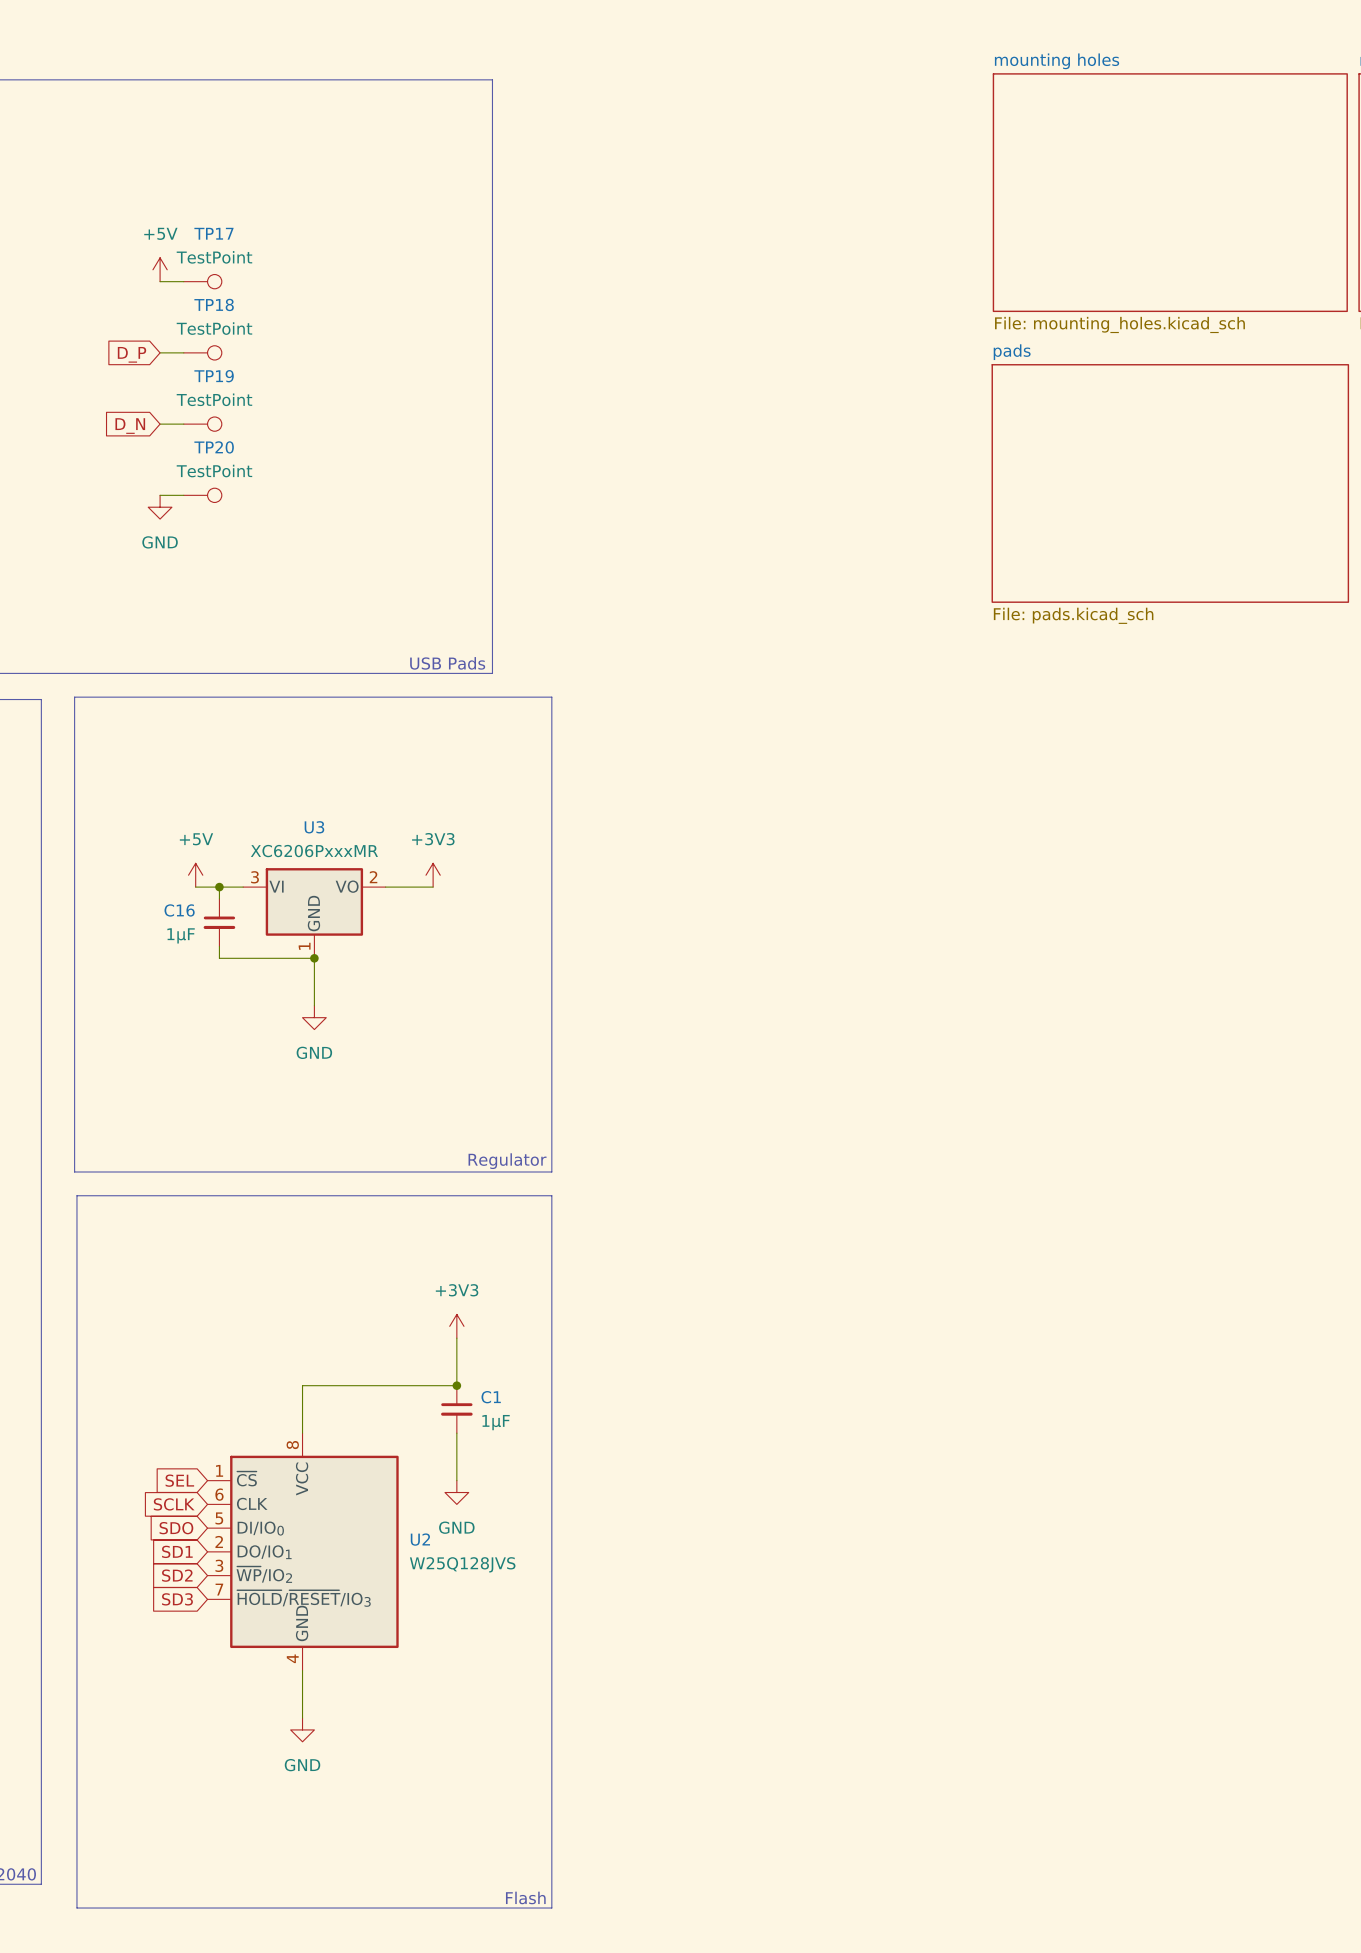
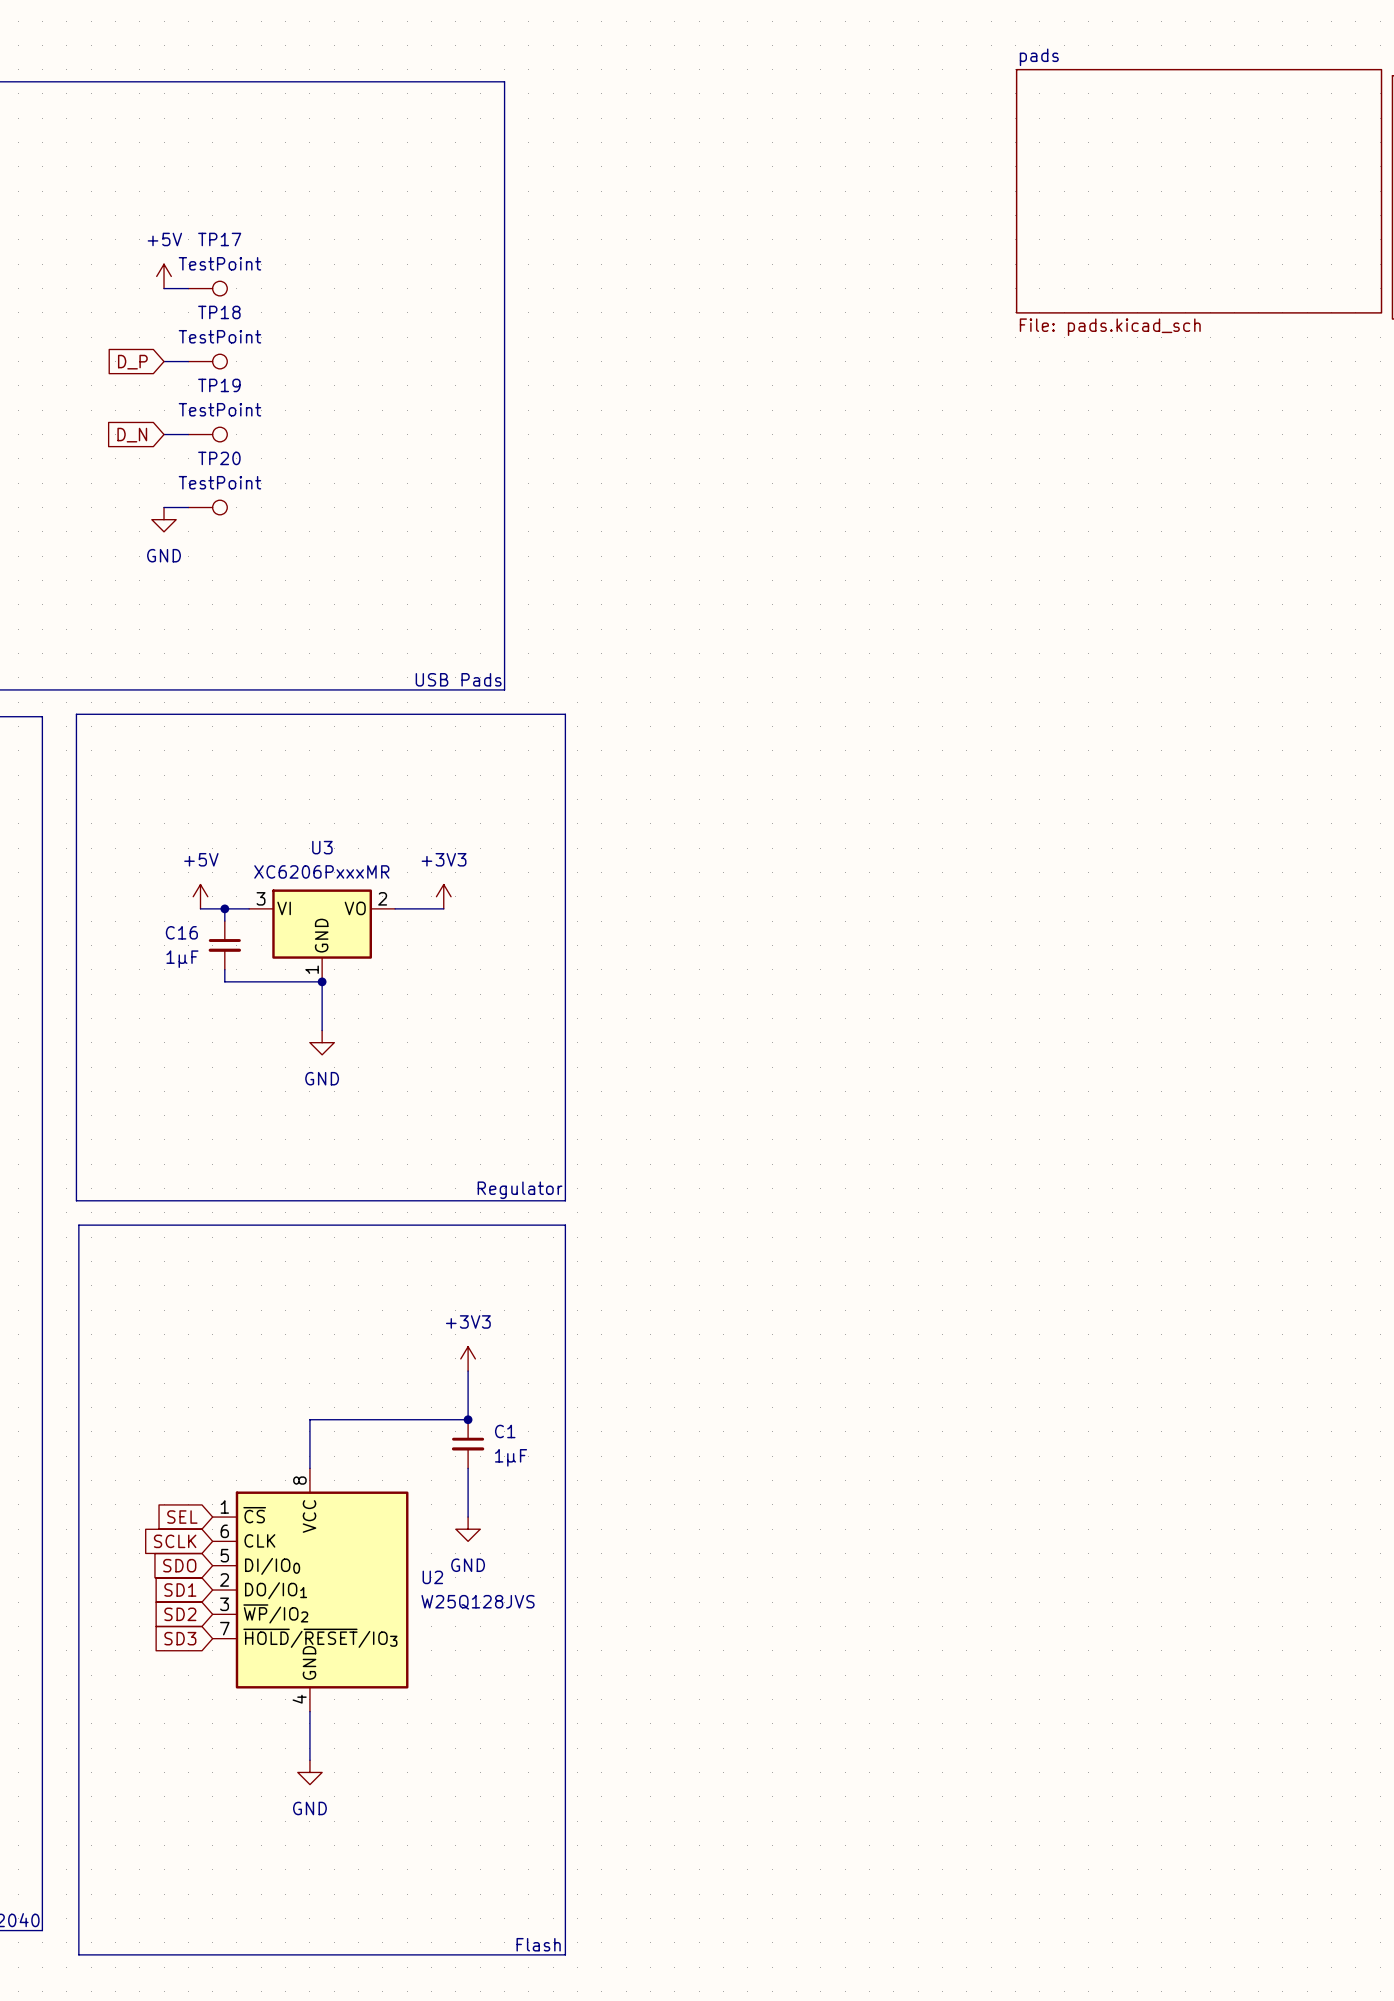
sheet pads: none -> File: pads.kicad_sch (1199, 191)
sheet mounting holes: File: mounting_holes.kicad_sch (1170, 192) -> none
sheet pads: File: pads.kicad_sch (1170, 483) -> none

